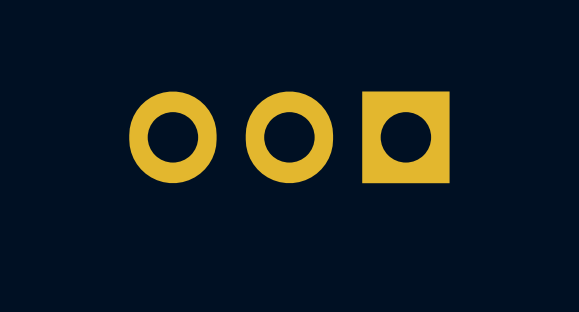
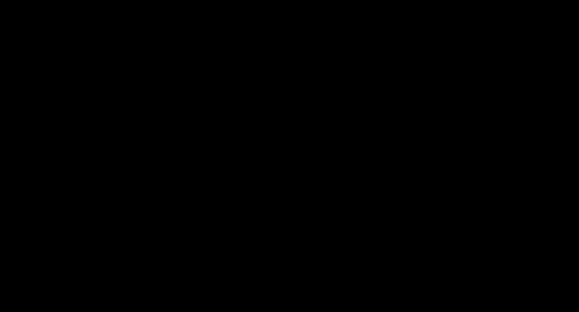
part: (289, 137) -> none

